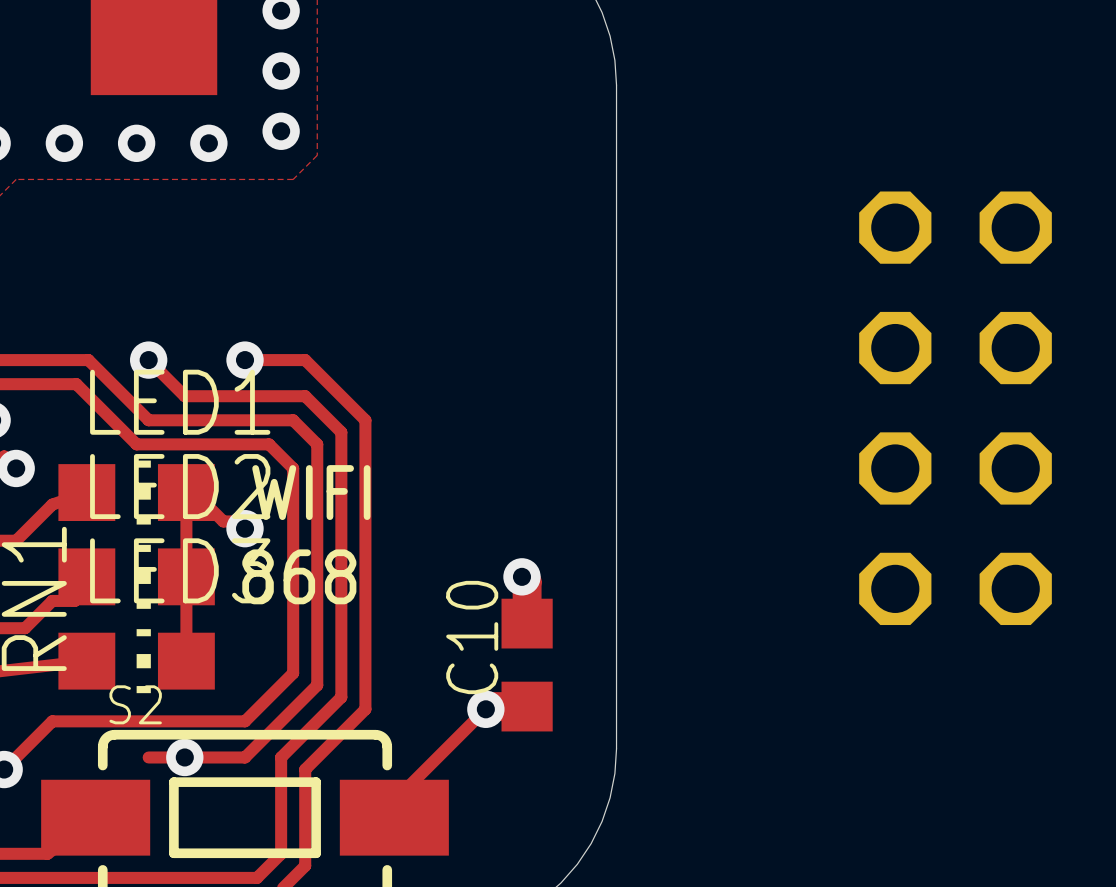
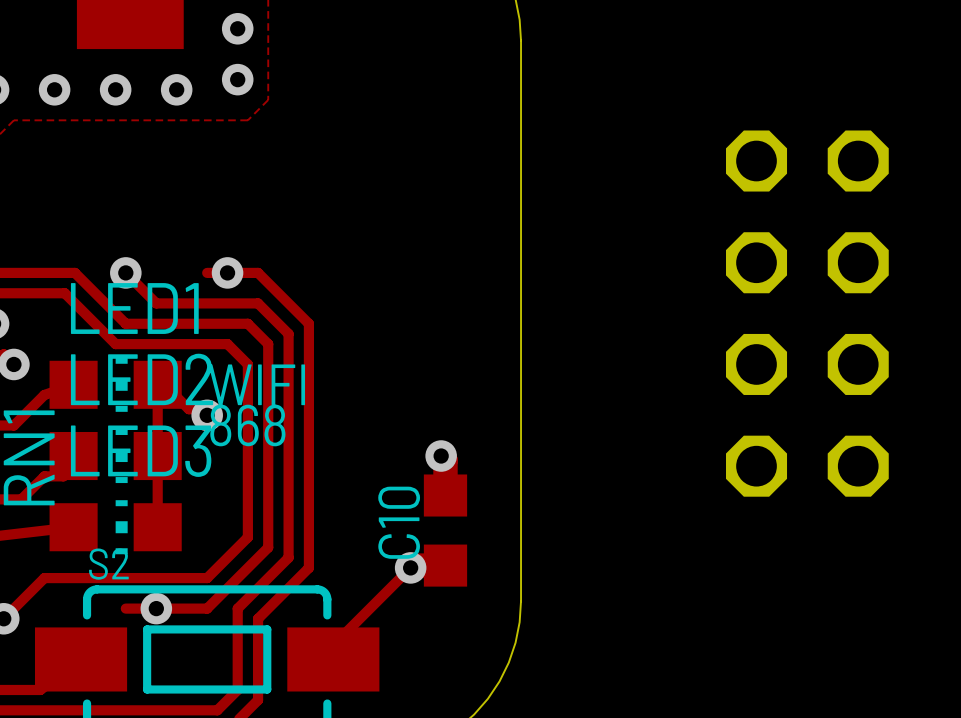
via position: (245, 360) -> (227, 272)
text position: 868 (299, 576) -> 868 (247, 425)

